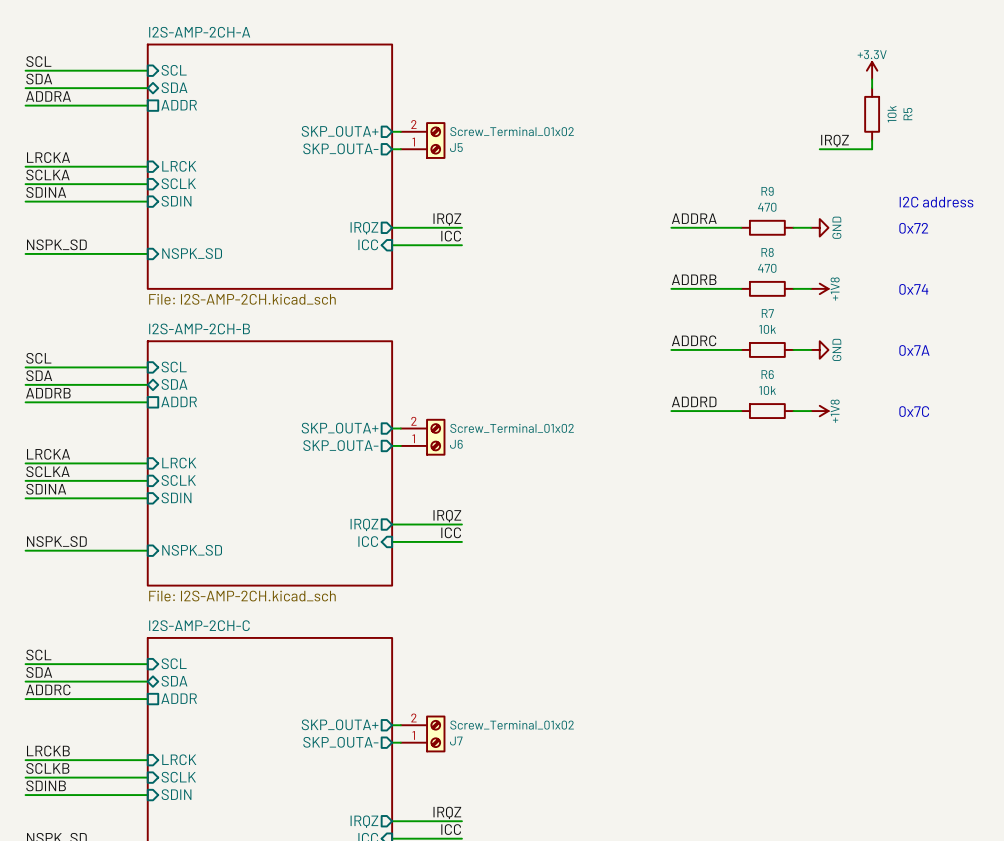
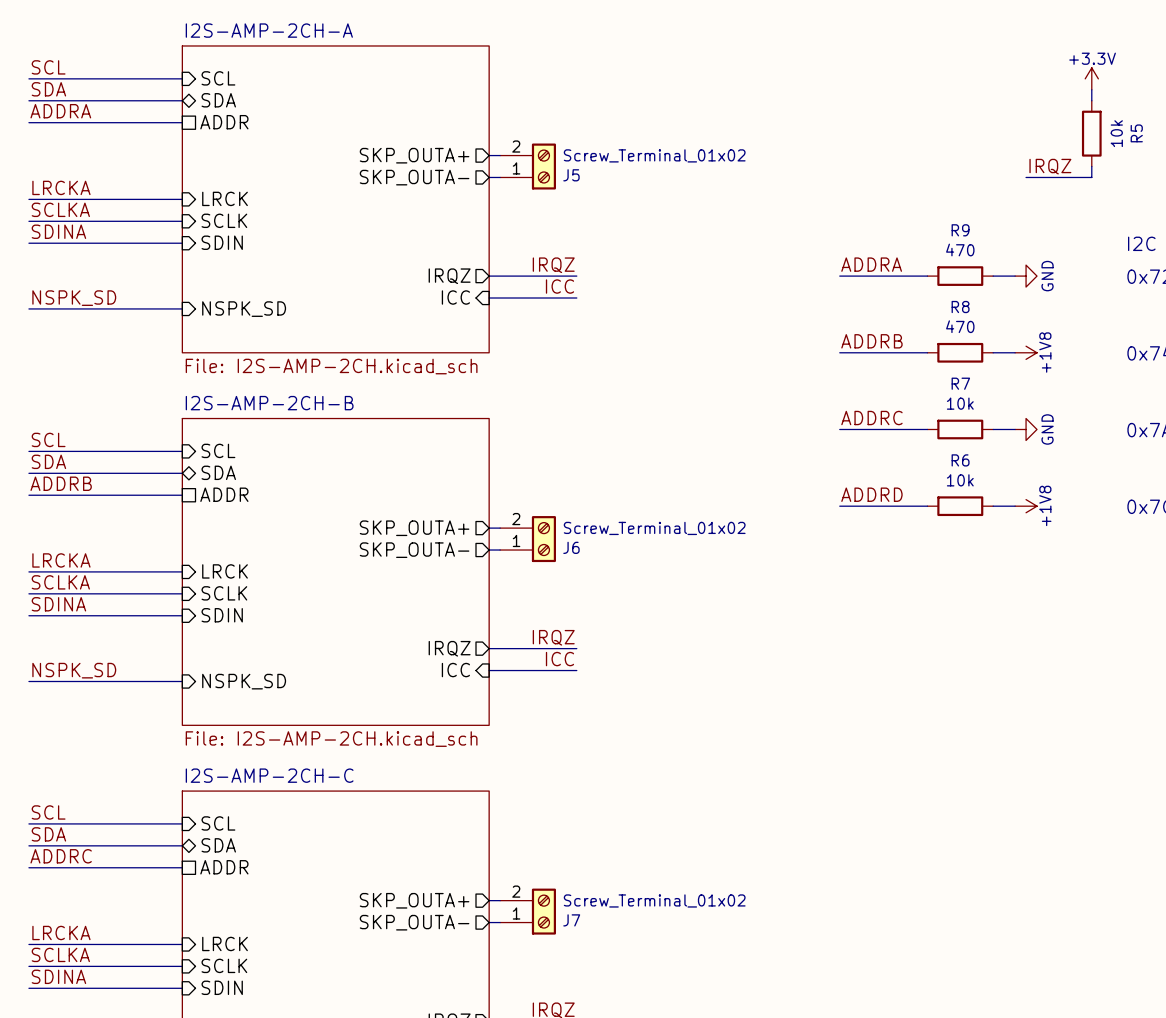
label: LRCKB (48, 751) -> LRCKA (61, 932)
label: SCLKB (47, 768) -> SCLKA (60, 954)
label: SDINB (46, 785) -> SDINA (58, 976)

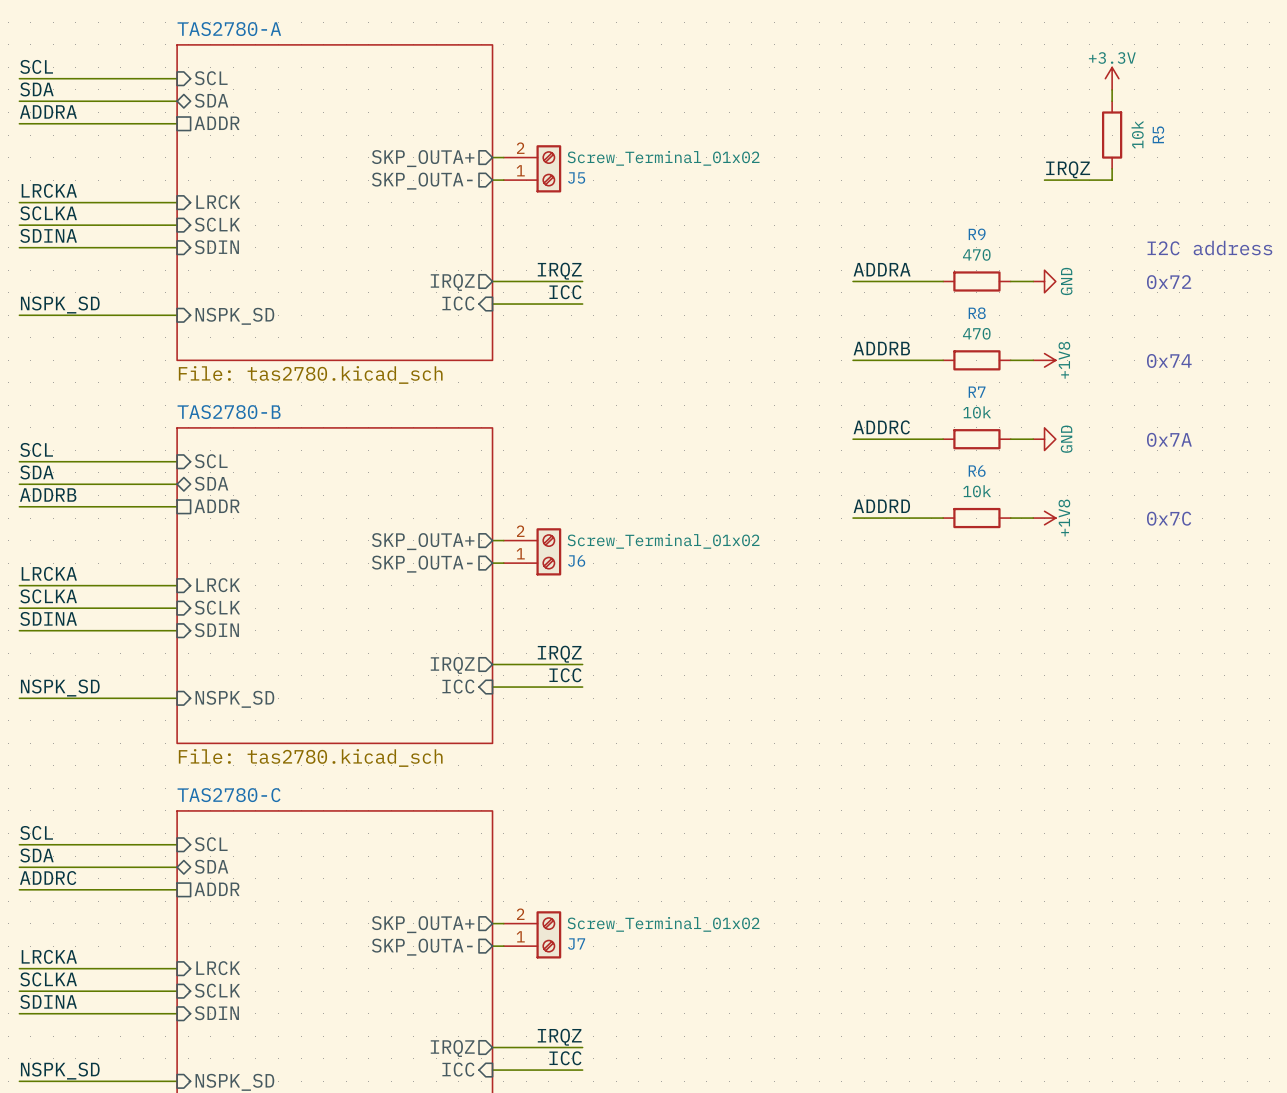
sheet I2S-AMP-2CH-A name: I2S-AMP-2CH-A (269, 30) -> TAS2780-A (229, 29)
sheet I2S-AMP-2CH-A value: File: I2S-AMP-2CH.kicad_sch (331, 366) -> File: tas2780.kicad_sch (310, 374)
sheet I2S-AMP-2CH-B name: I2S-AMP-2CH-B (269, 403) -> TAS2780-B (229, 412)
sheet I2S-AMP-2CH-B value: File: I2S-AMP-2CH.kicad_sch (331, 739) -> File: tas2780.kicad_sch (310, 758)
sheet I2S-AMP-2CH-C name: I2S-AMP-2CH-C (269, 775) -> TAS2780-C (229, 795)

